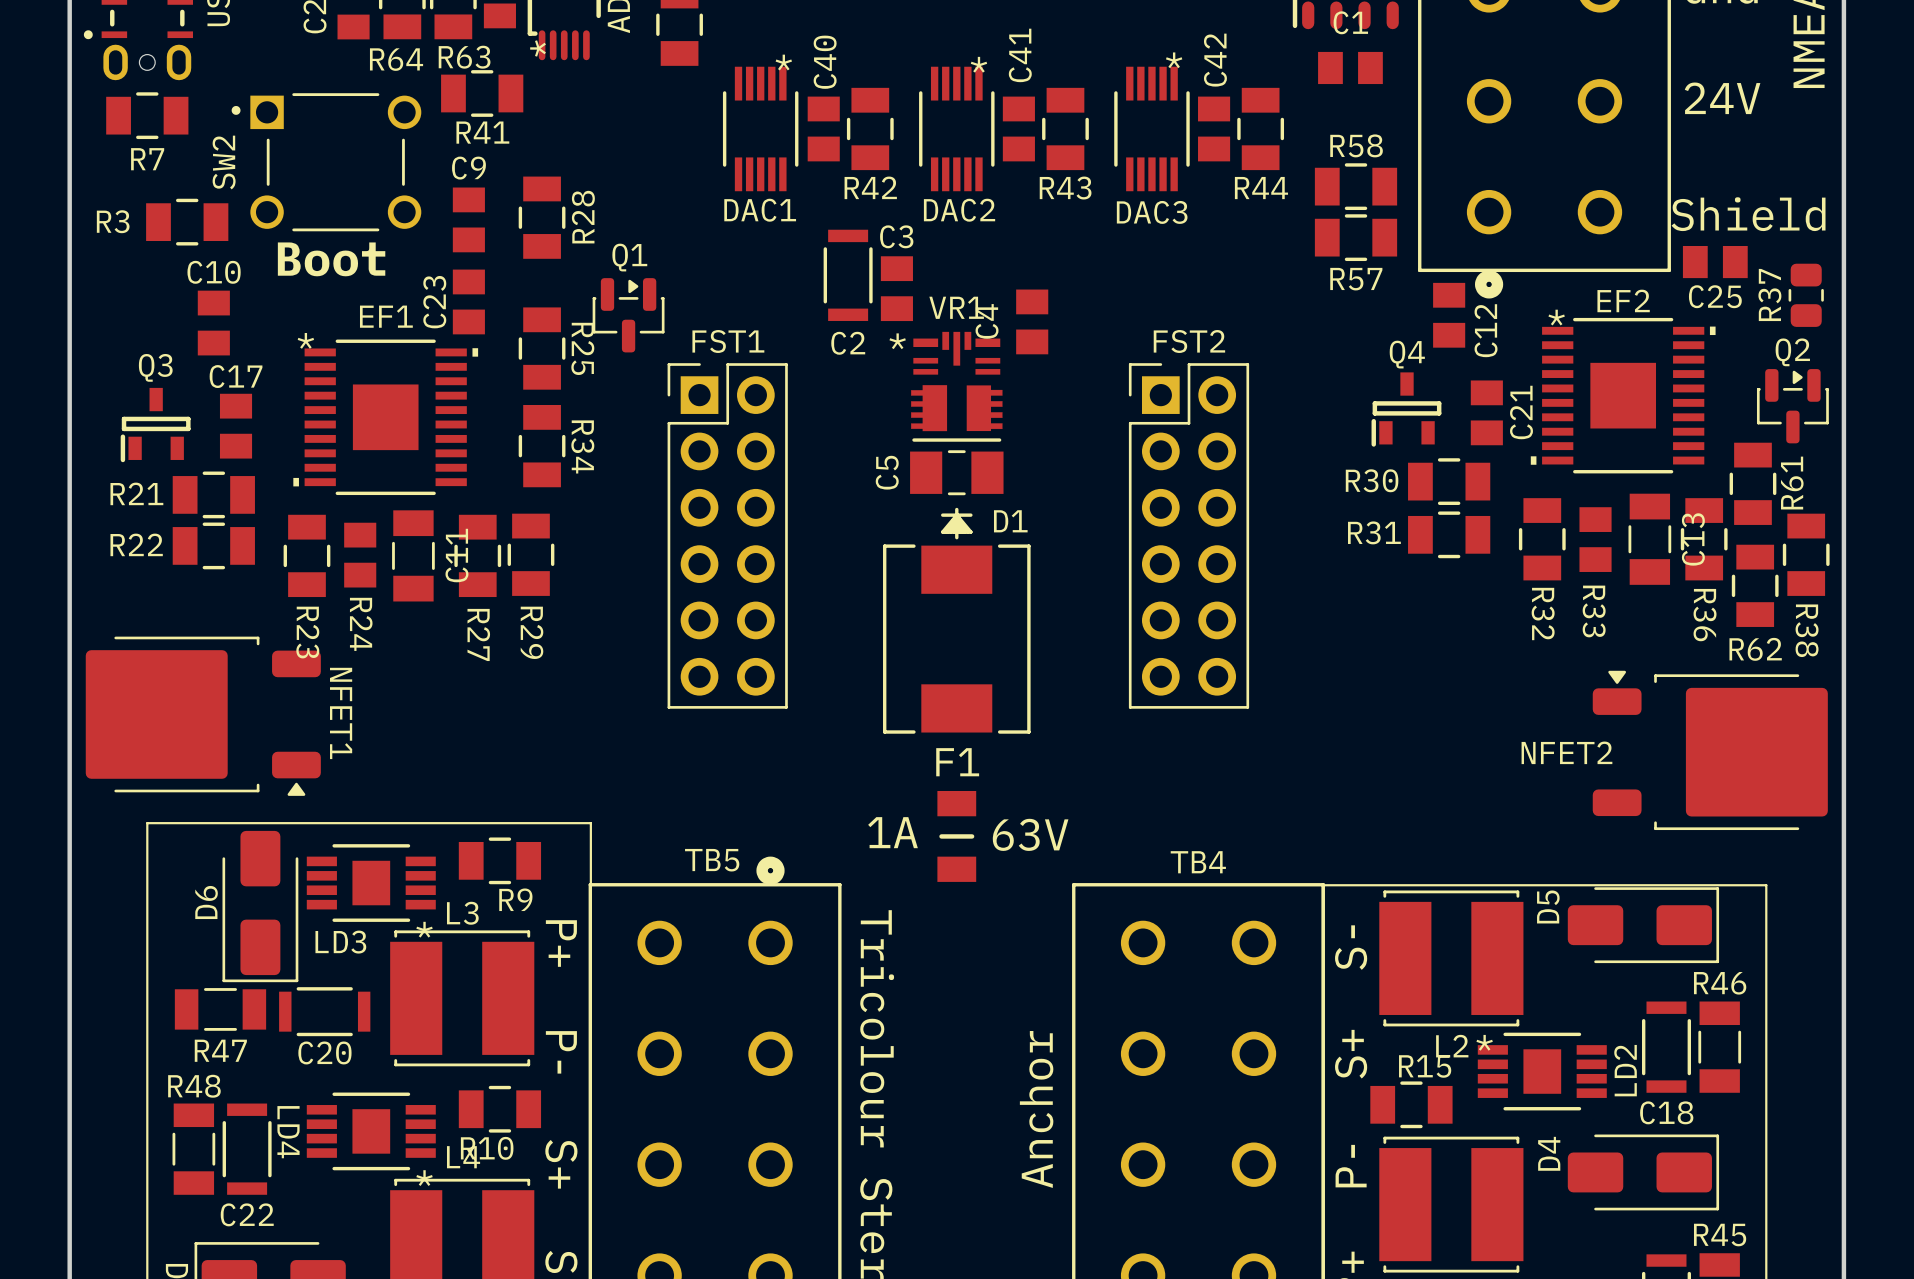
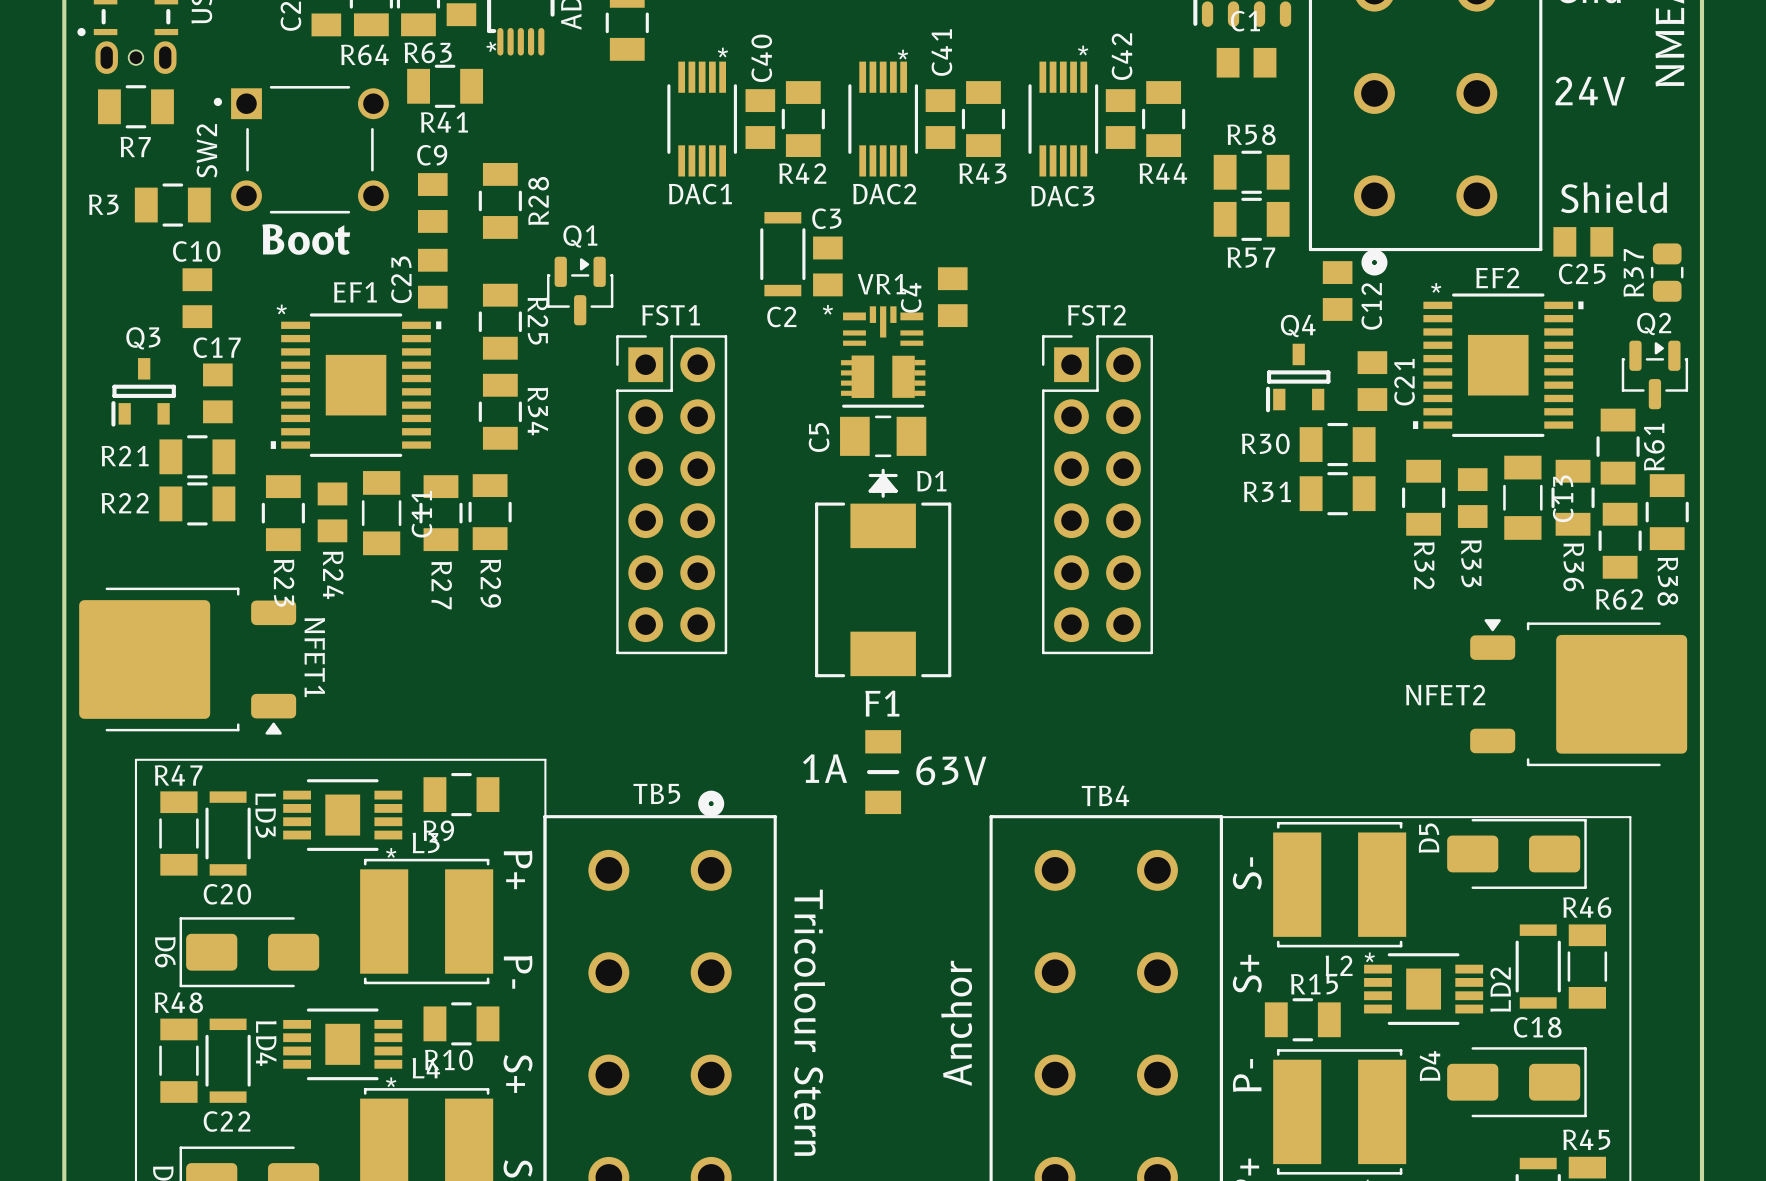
R9 name position: R9 (515, 899) -> R9 (438, 830)
D6 rotation: 0° (260, 906) -> 90° clockwise (249, 952)
D6 position: (260, 906) -> (249, 952)
LD3 name rotation: 0° (340, 942) -> 90° clockwise (265, 815)
LD3 name position: LD3 (340, 942) -> LD3 (265, 815)
R47 rotation: 0° (220, 1009) -> 90° clockwise (178, 833)
R47 position: (220, 1009) -> (178, 833)
C20 rotation: 0° (324, 1011) -> 90° clockwise (228, 833)
C20 position: (324, 1011) -> (228, 833)
R47 name position: R47 (220, 1050) -> R47 (178, 775)

